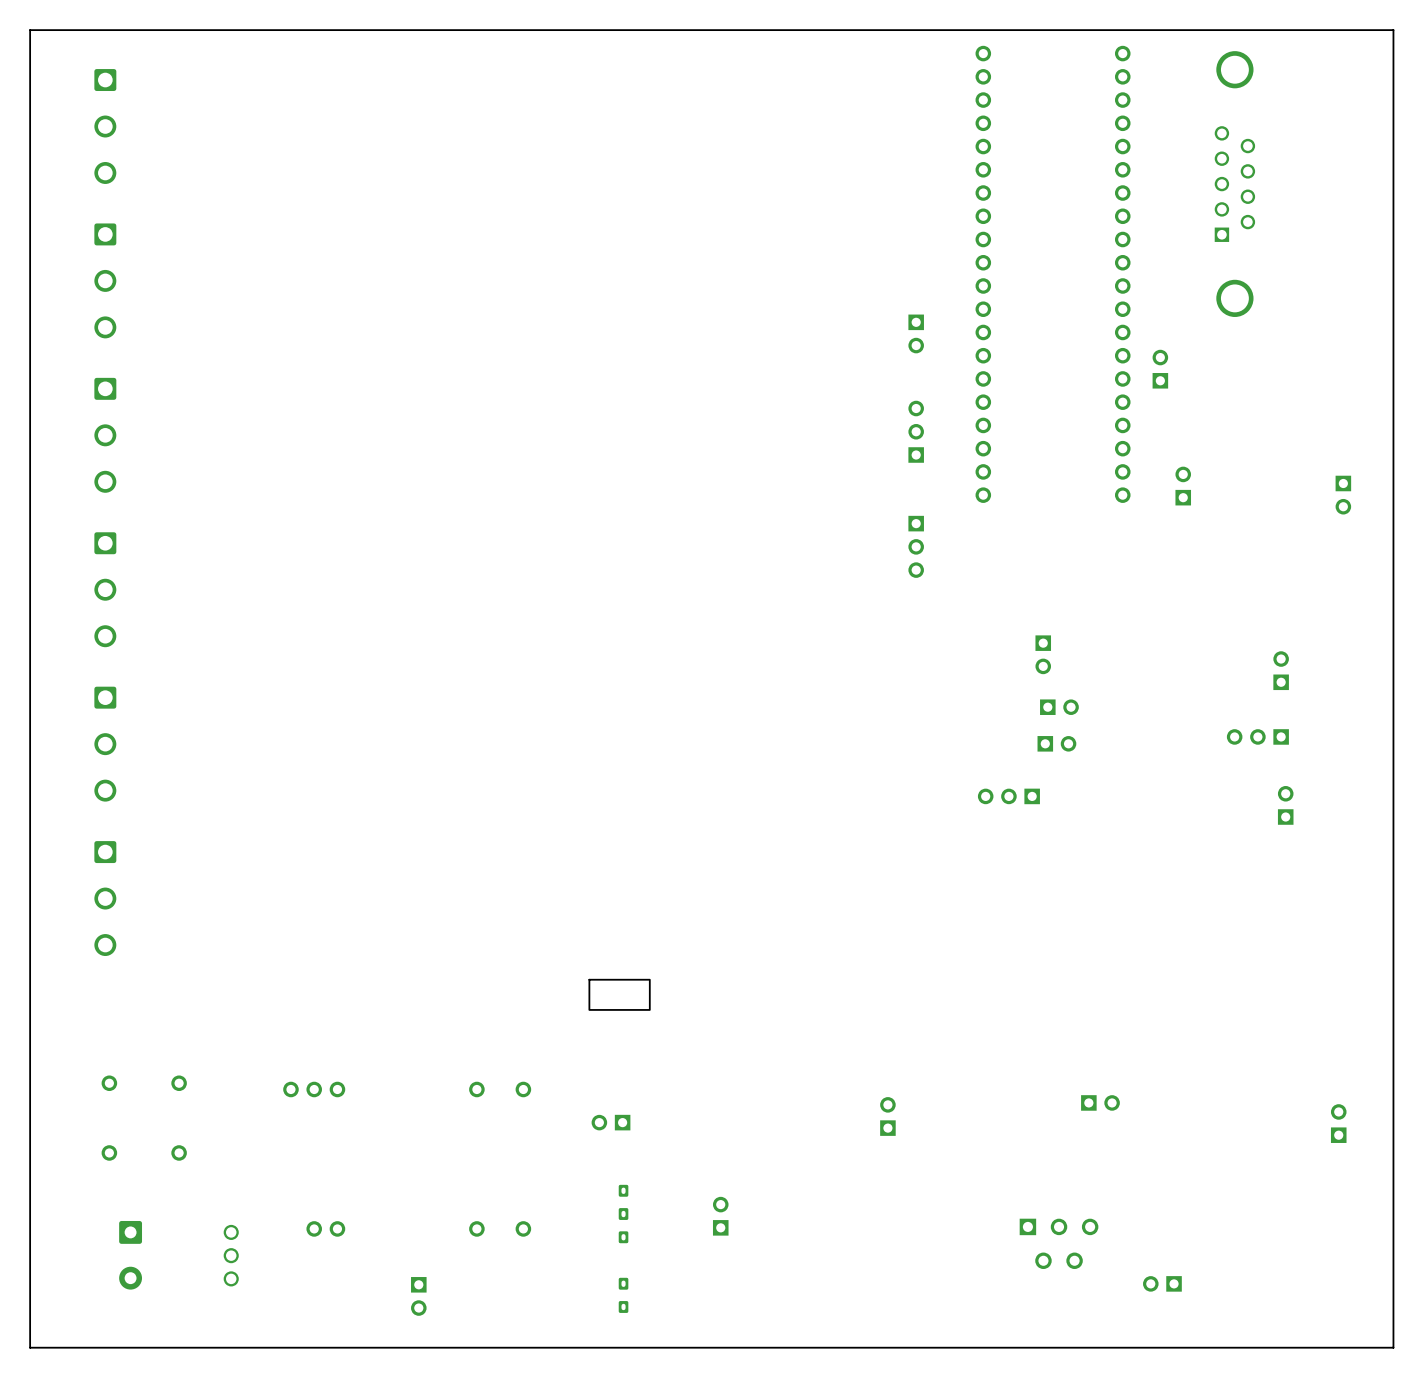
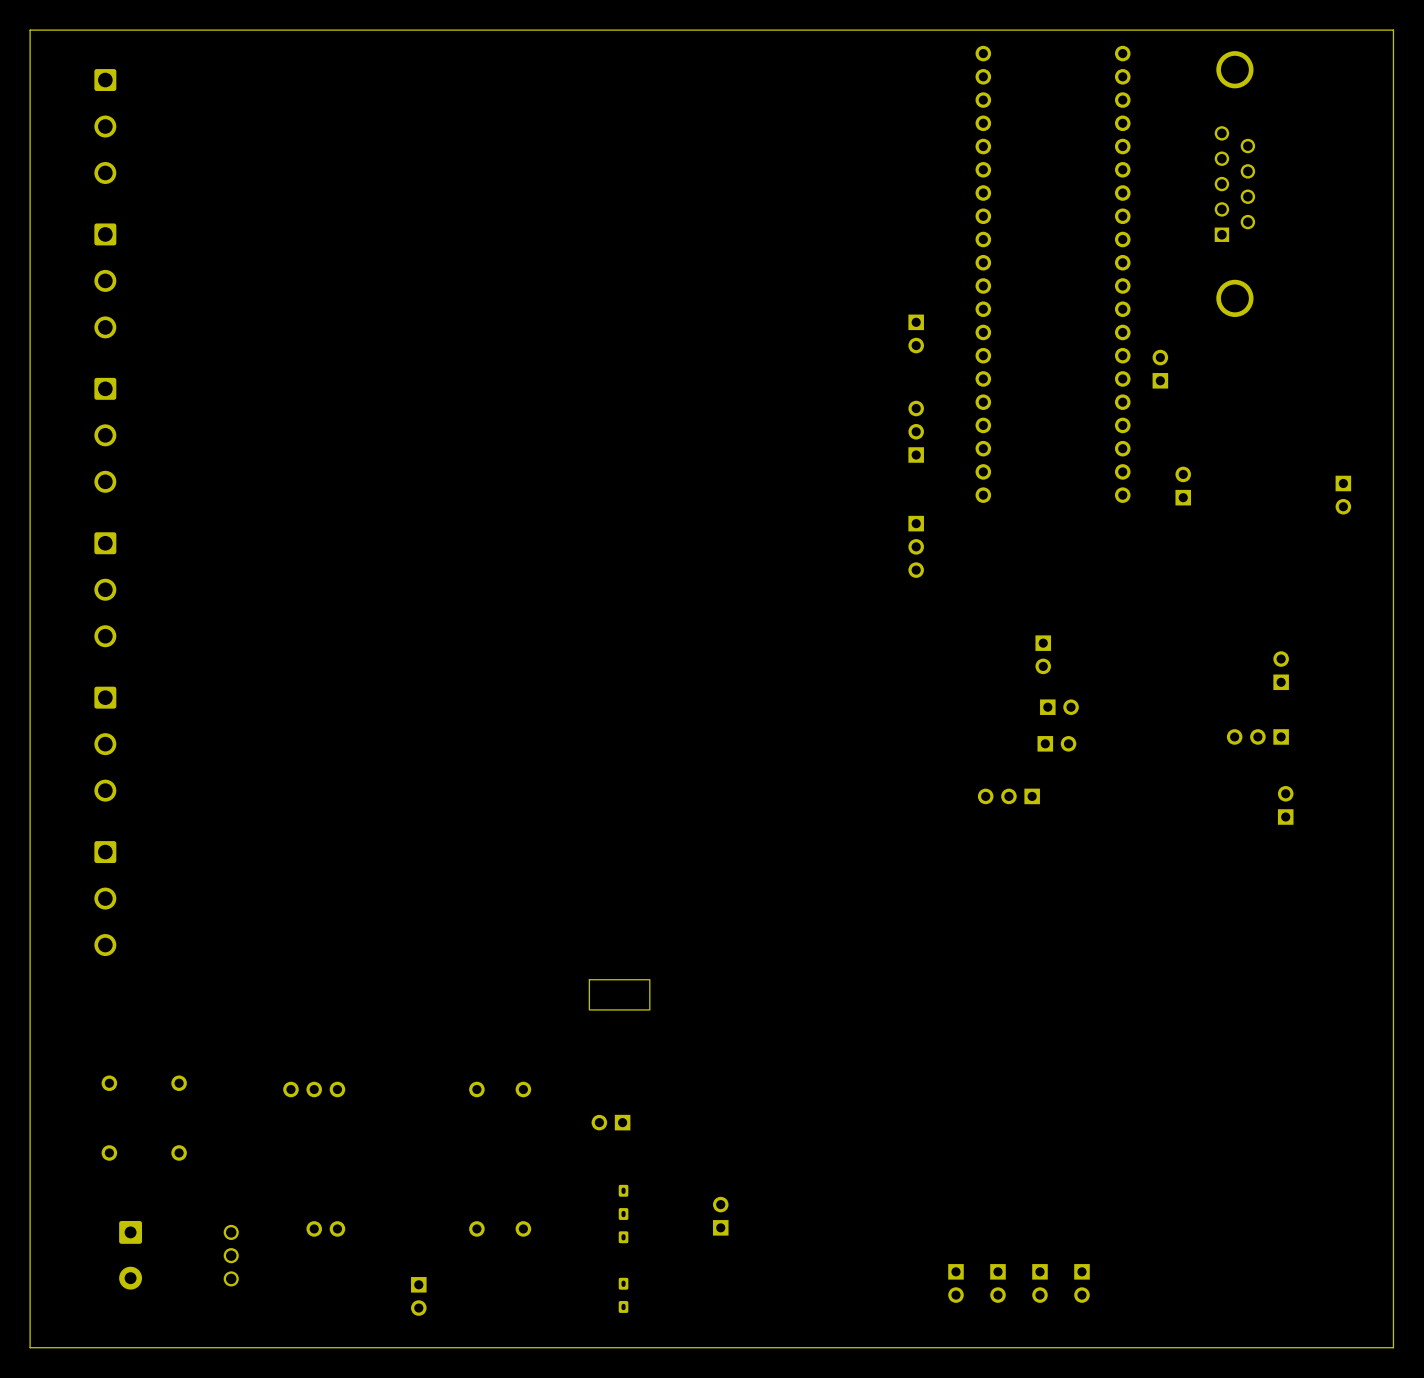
part: (1100, 1102) -> none
part: (887, 1116) -> none
part: (1338, 1123) -> none
part: (1059, 1243) -> none
part: none -> (955, 1283)
part: none -> (997, 1283)
part: none -> (1039, 1283)
part: none -> (1081, 1283)
part: (1162, 1283) -> none

